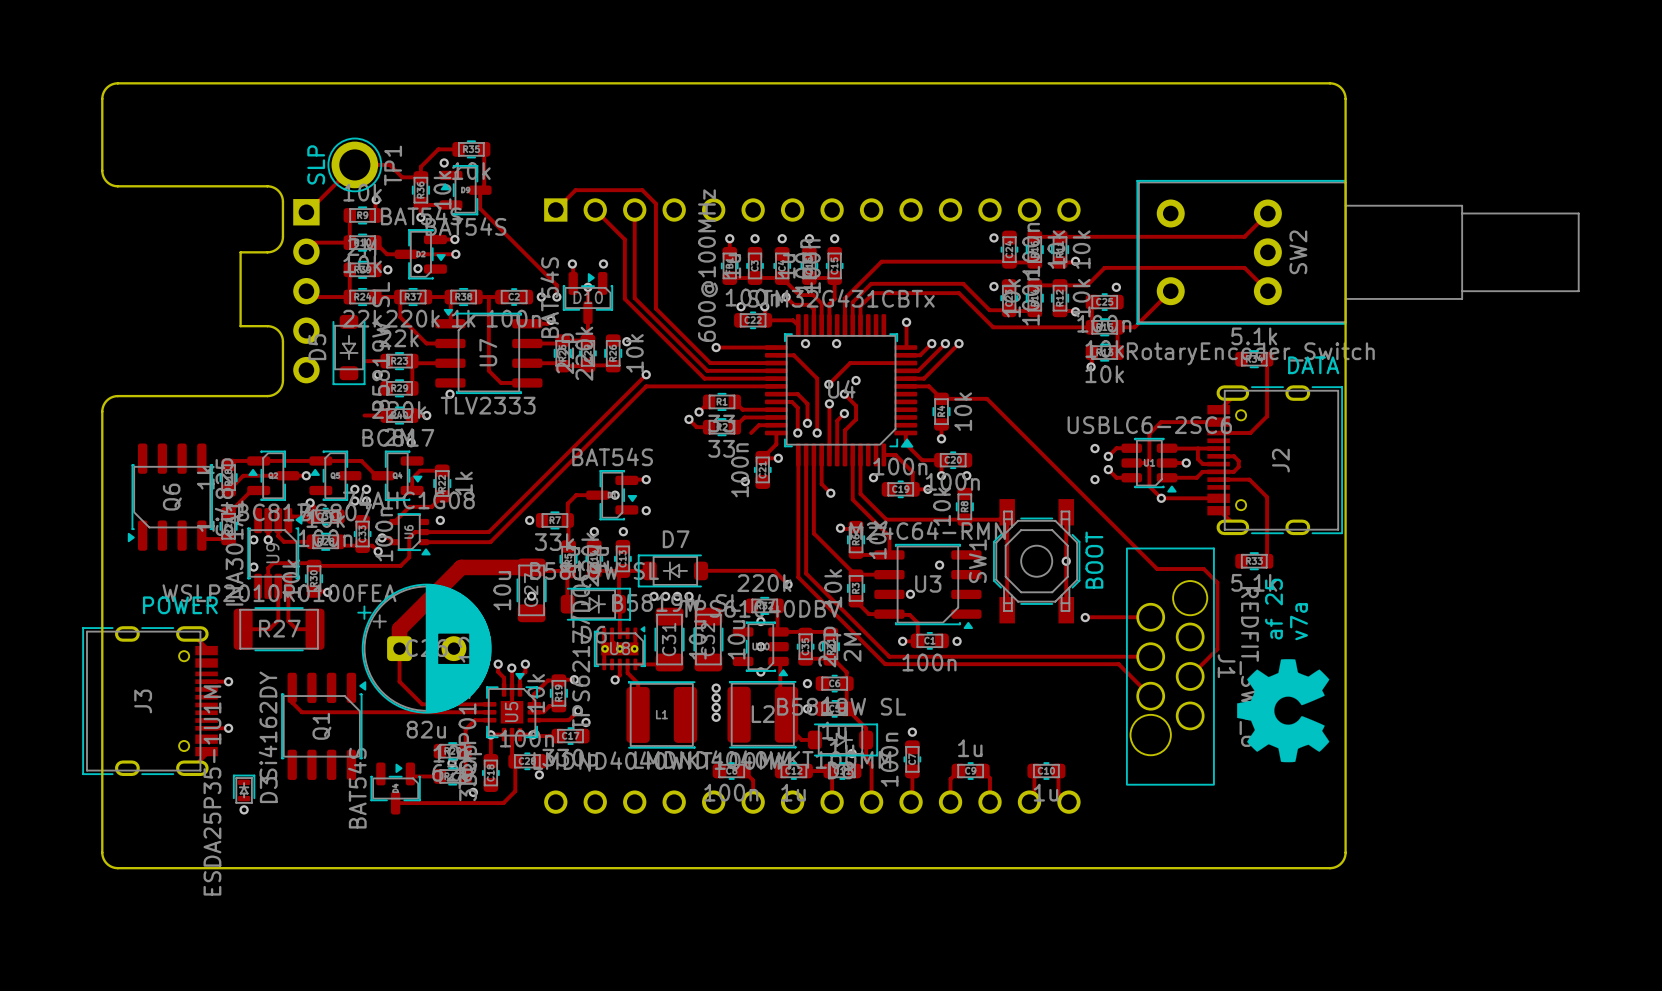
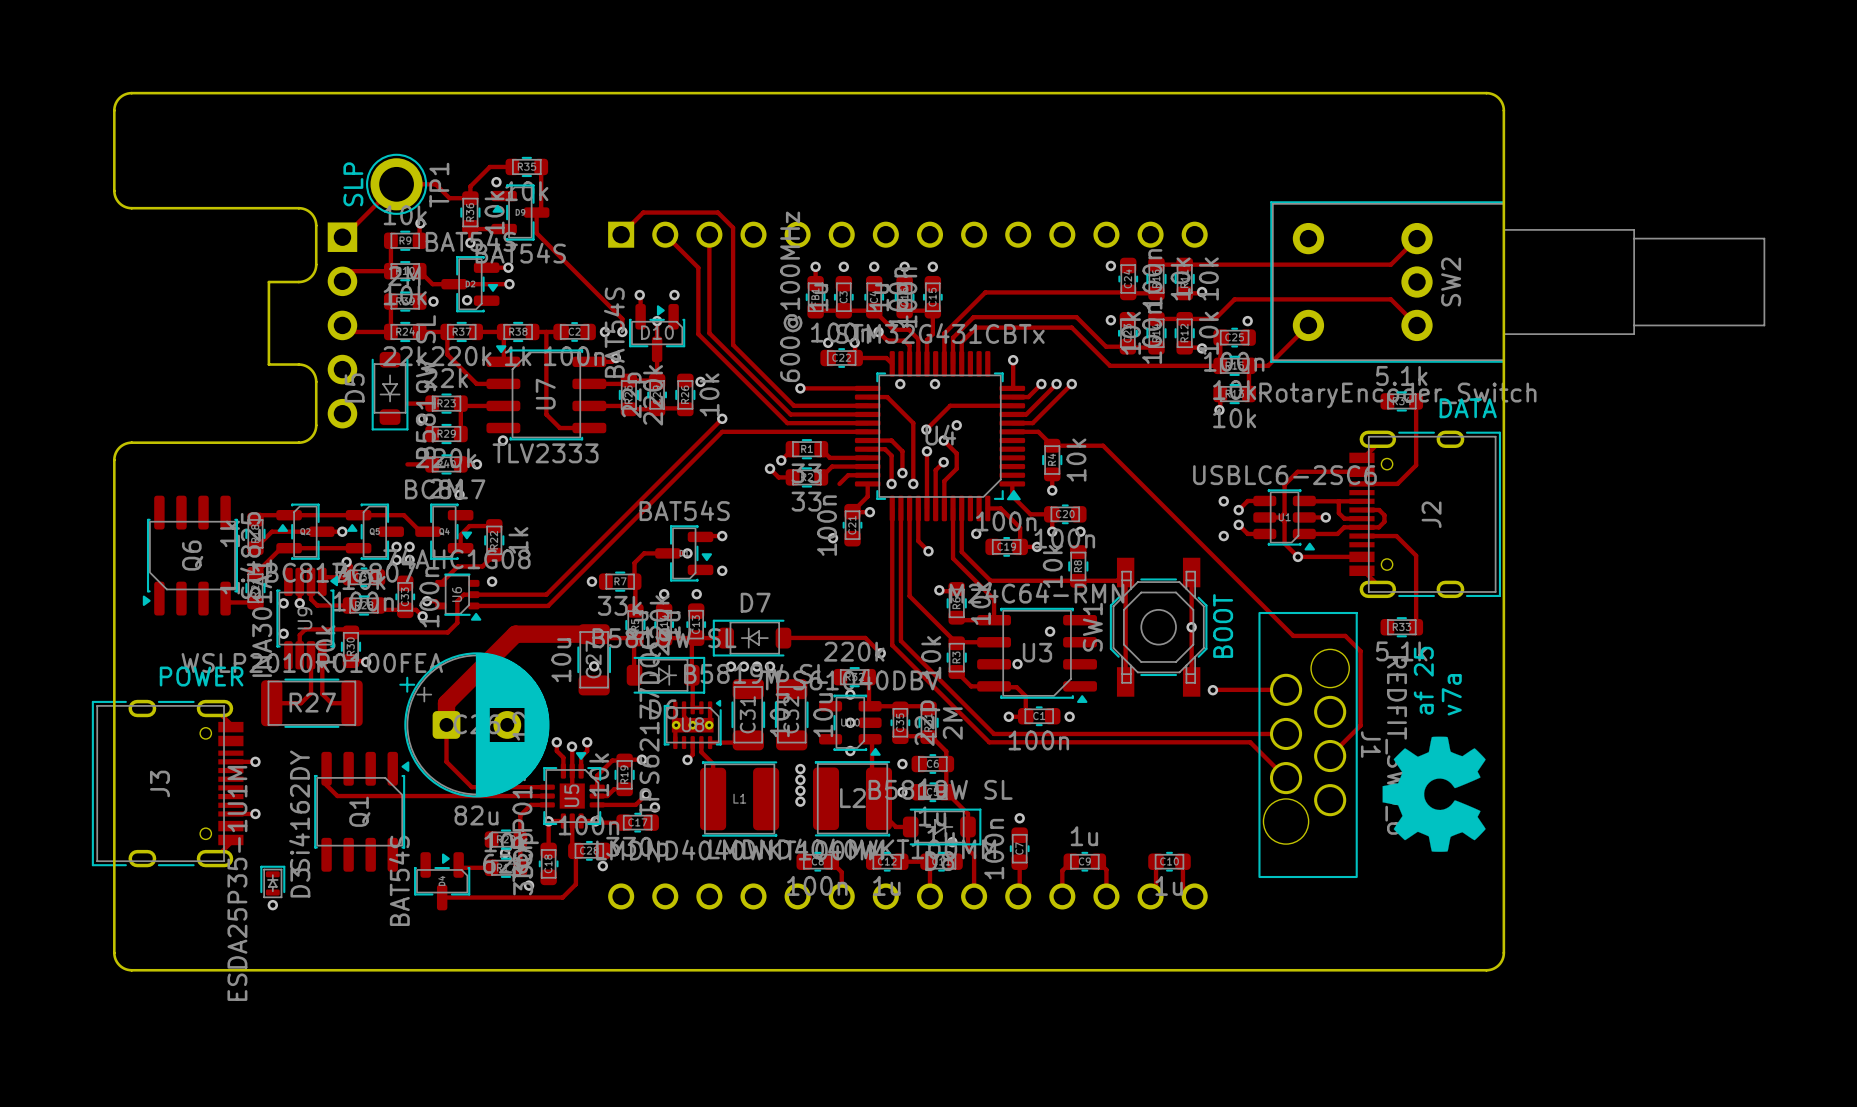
track: none -> (289, 548) (358, 548)

